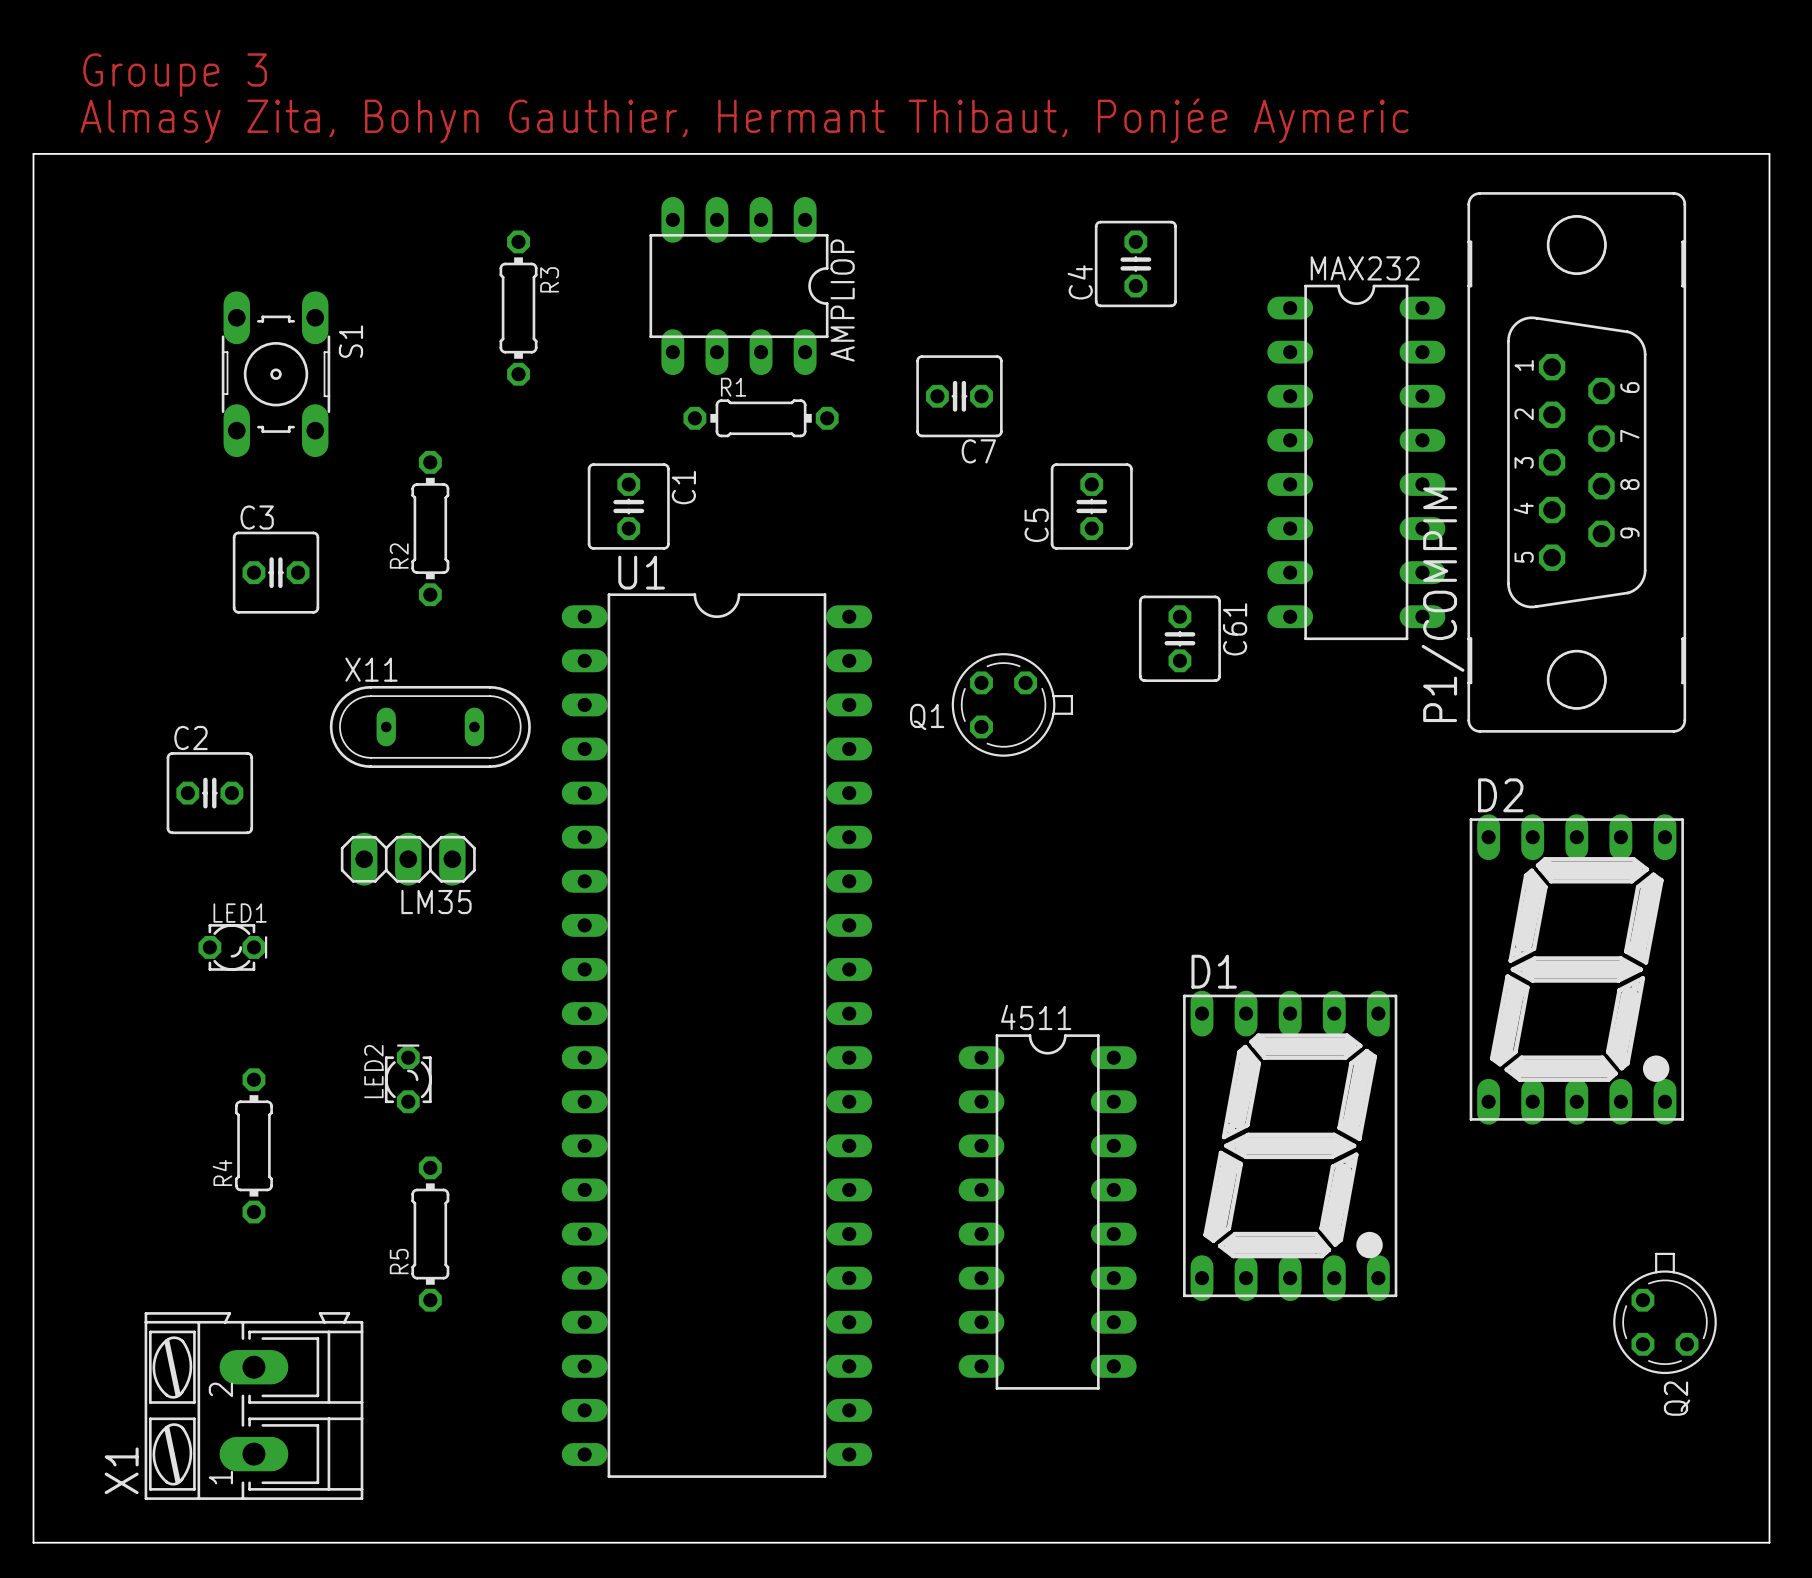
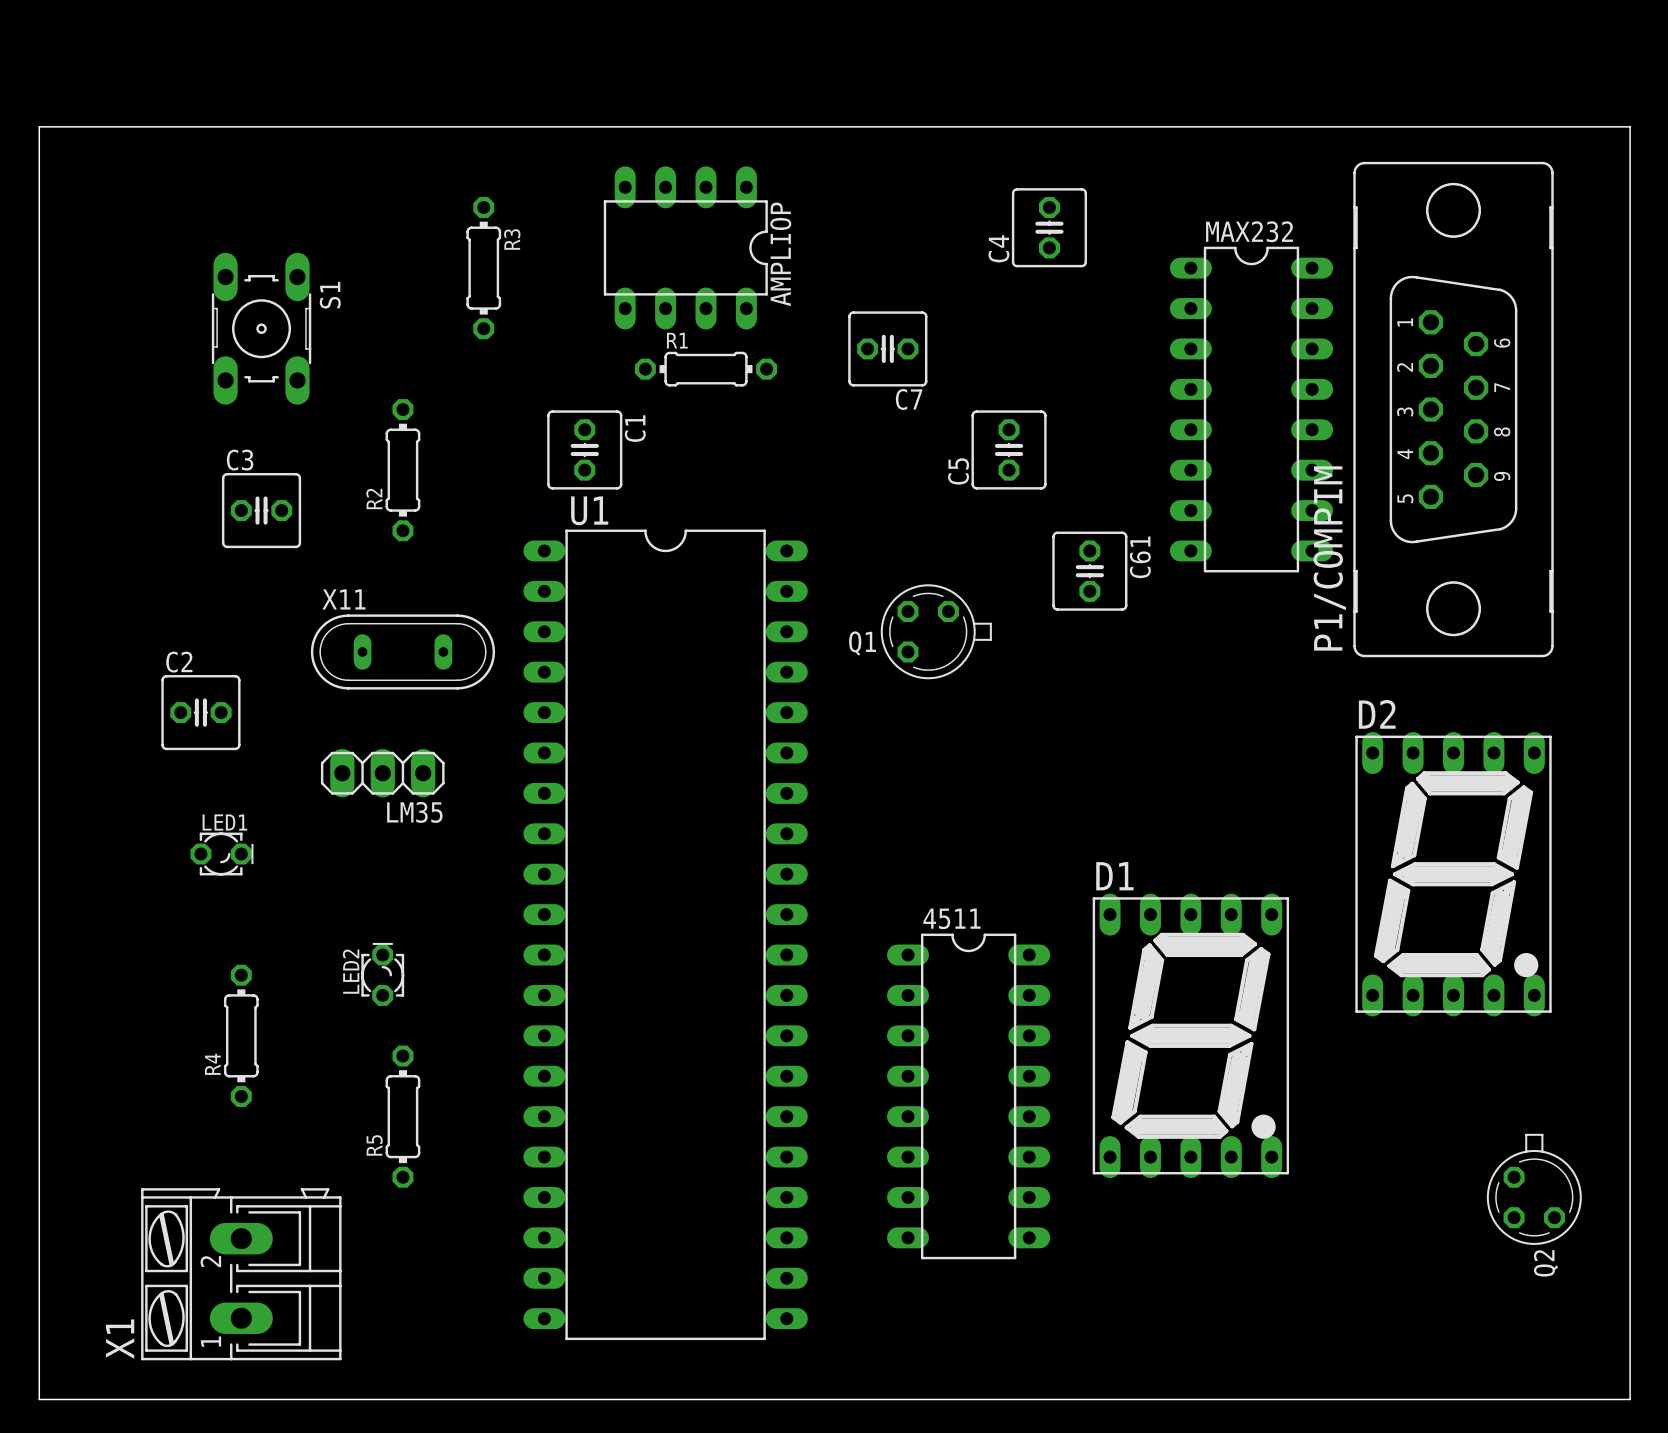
text: Groupe 3 (175, 75) -> none
text: Almasy Zita, Bohyn Gauthier, Hermant Thibaut, Ponjée Aymeric (744, 120) -> none

